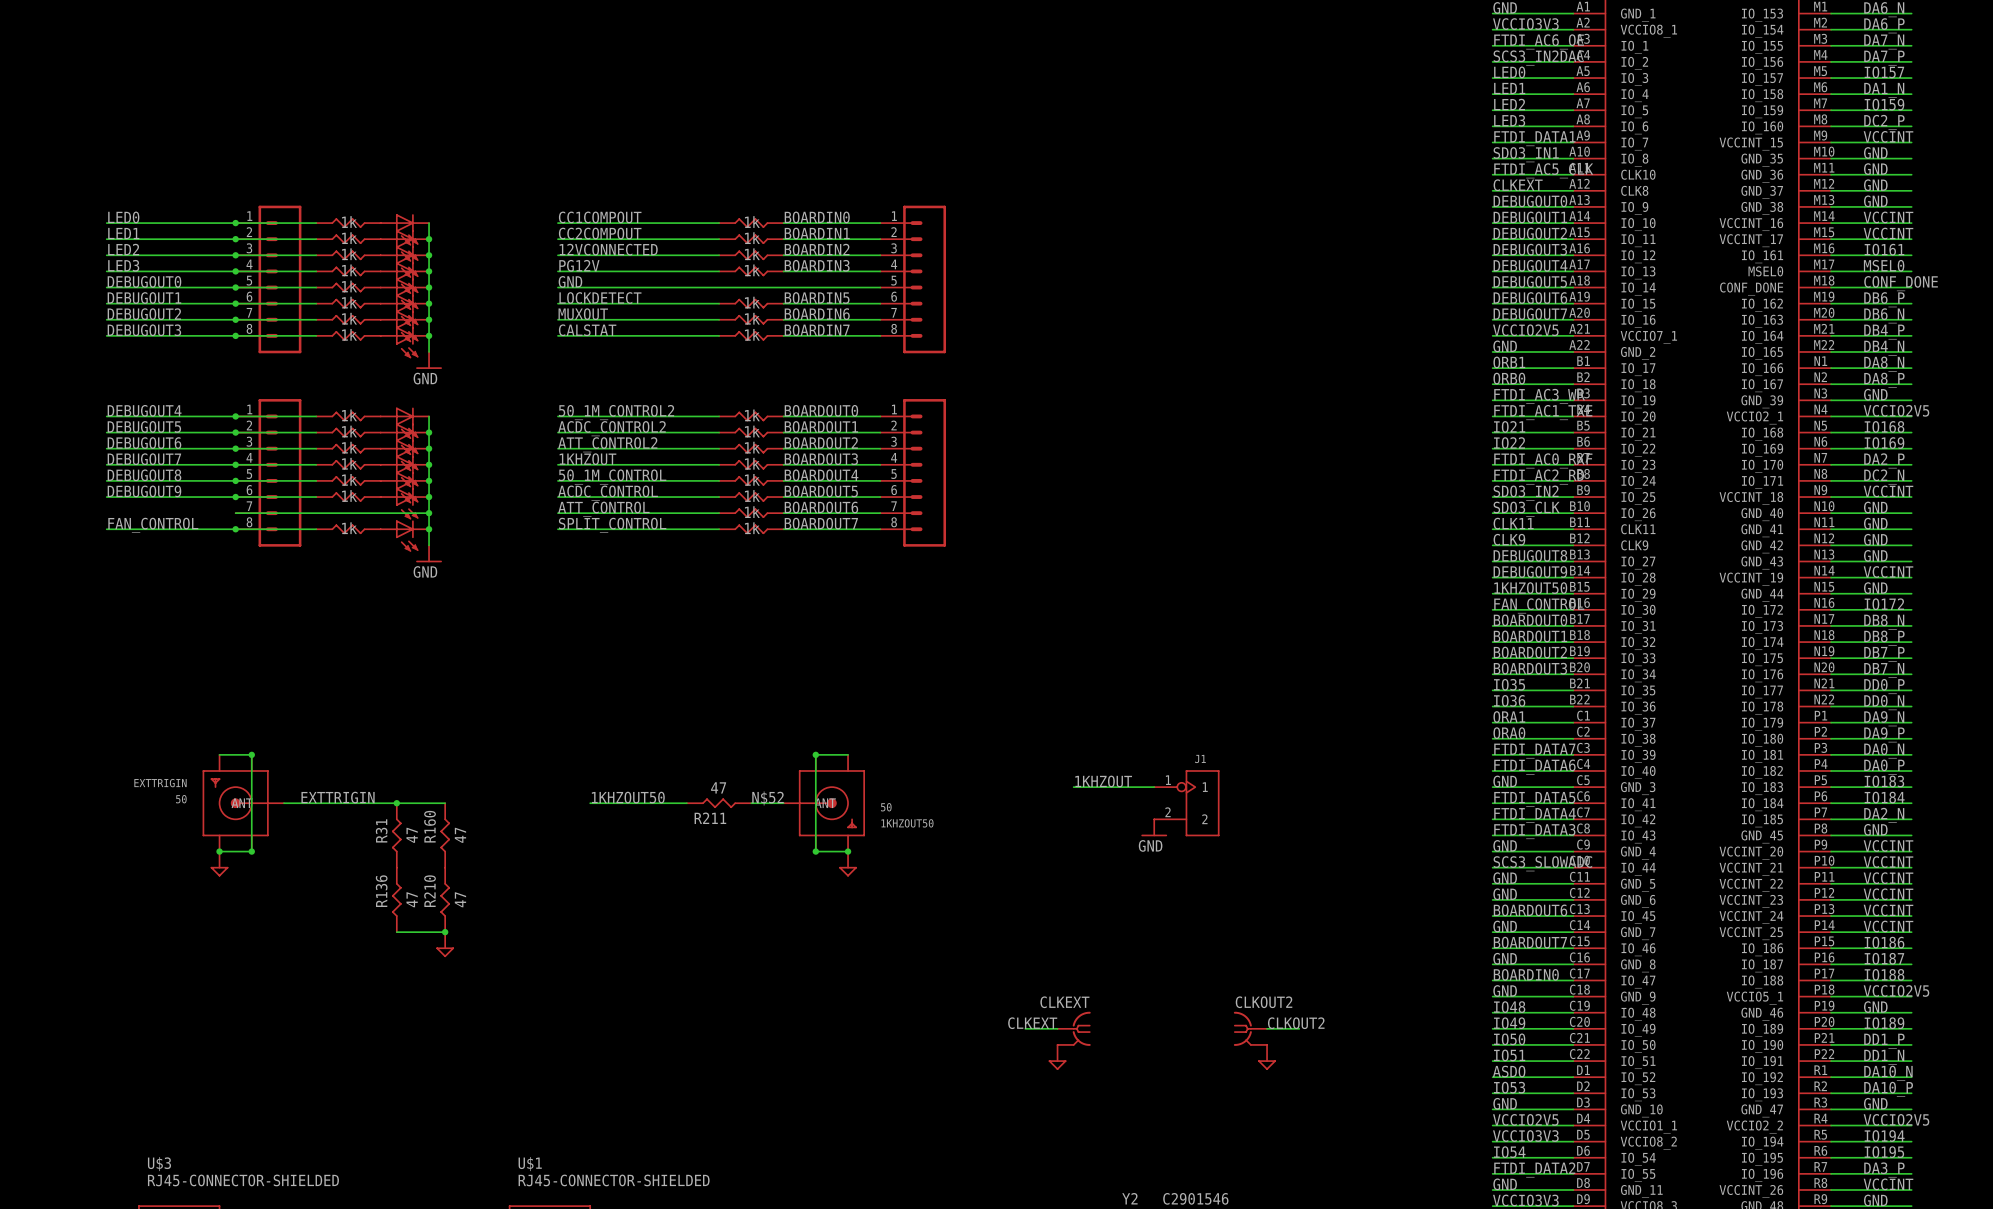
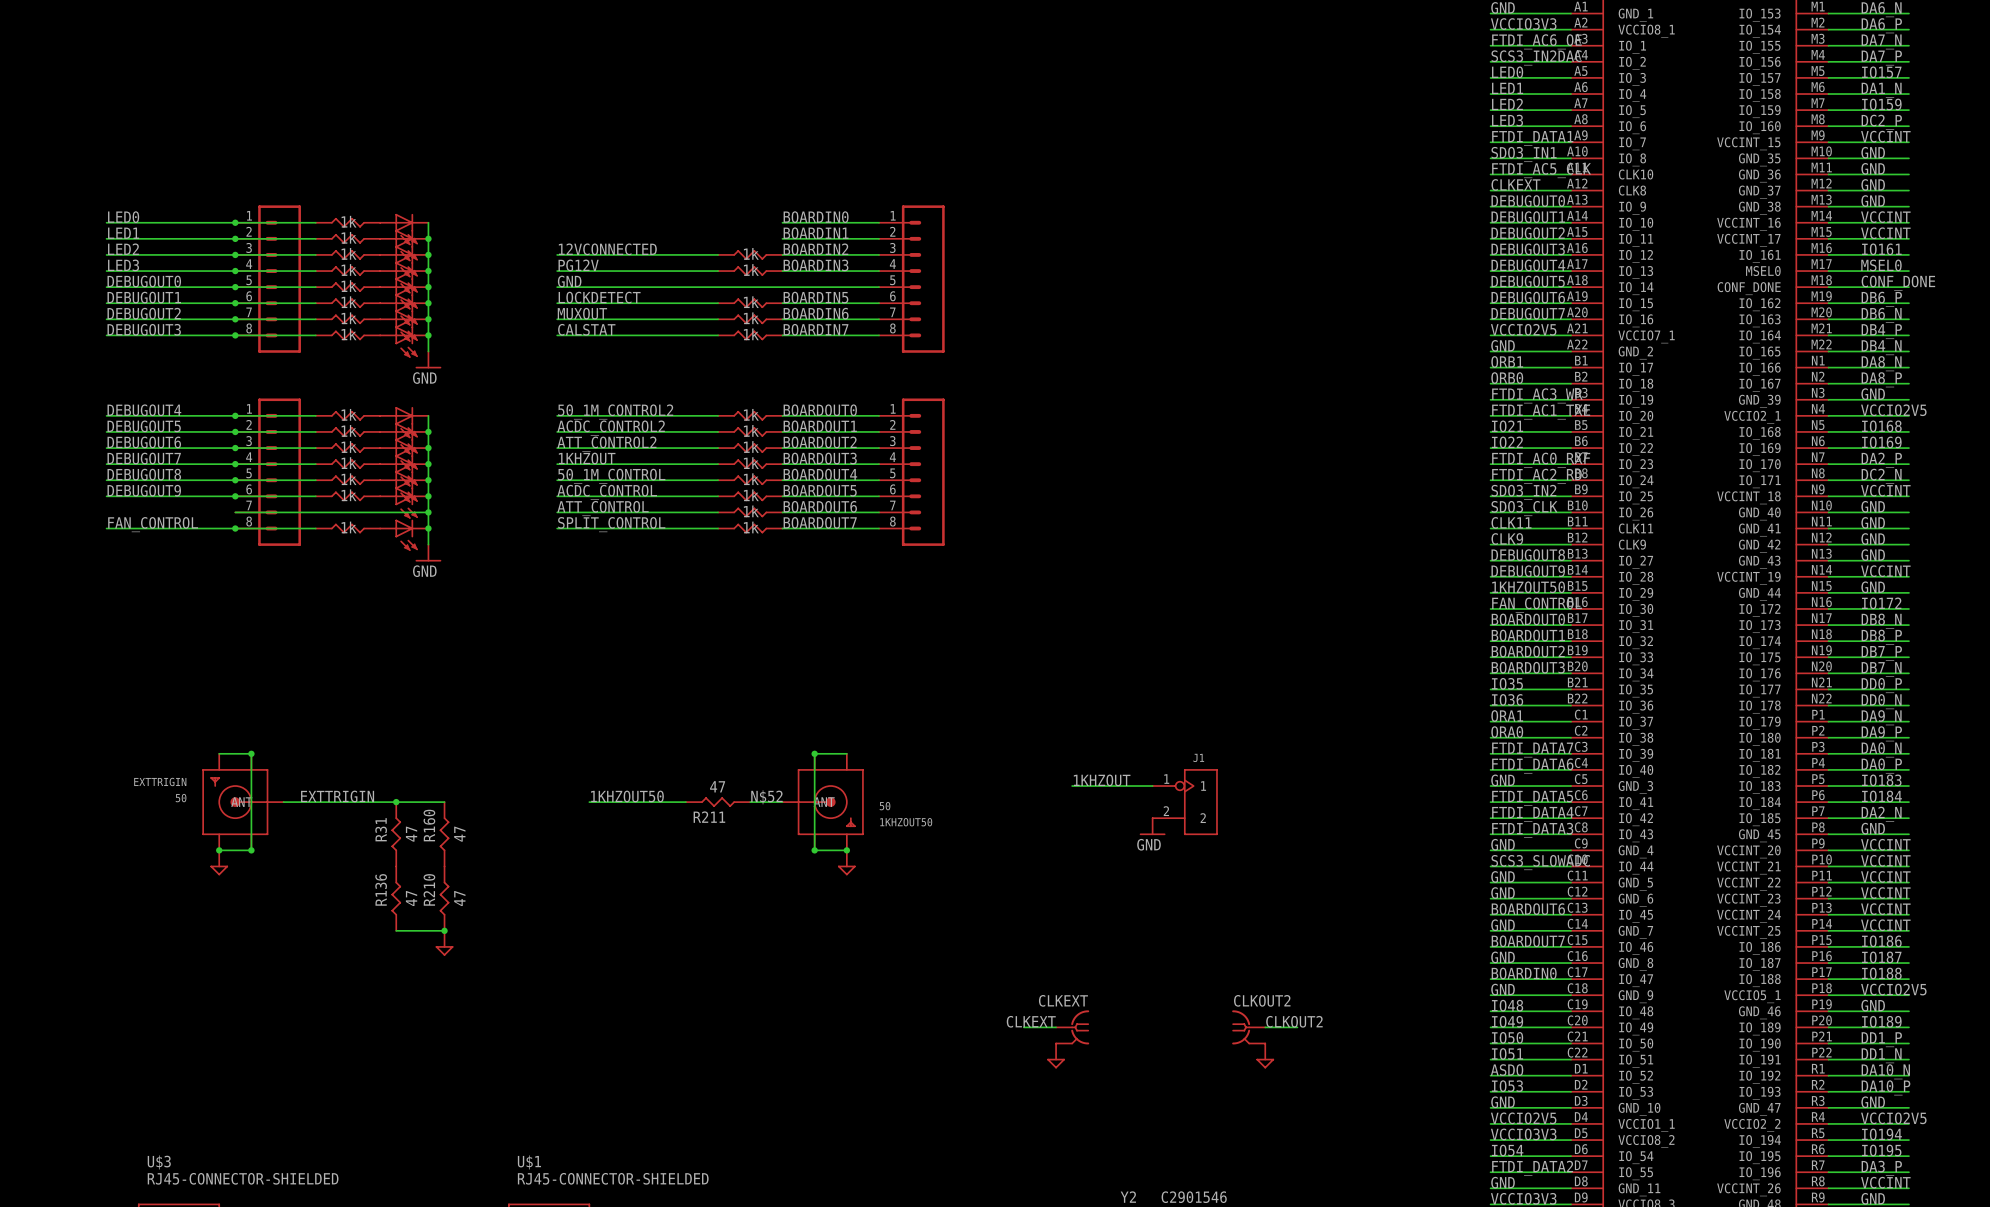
label: CC1COMPOUT (600, 217) -> none
wire: (557, 223) (719, 223) -> none
part: 1k (751, 223) -> none
label: CC2COMPOUT (600, 233) -> none
wire: (557, 239) (719, 239) -> none
part: 1k (751, 239) -> none

